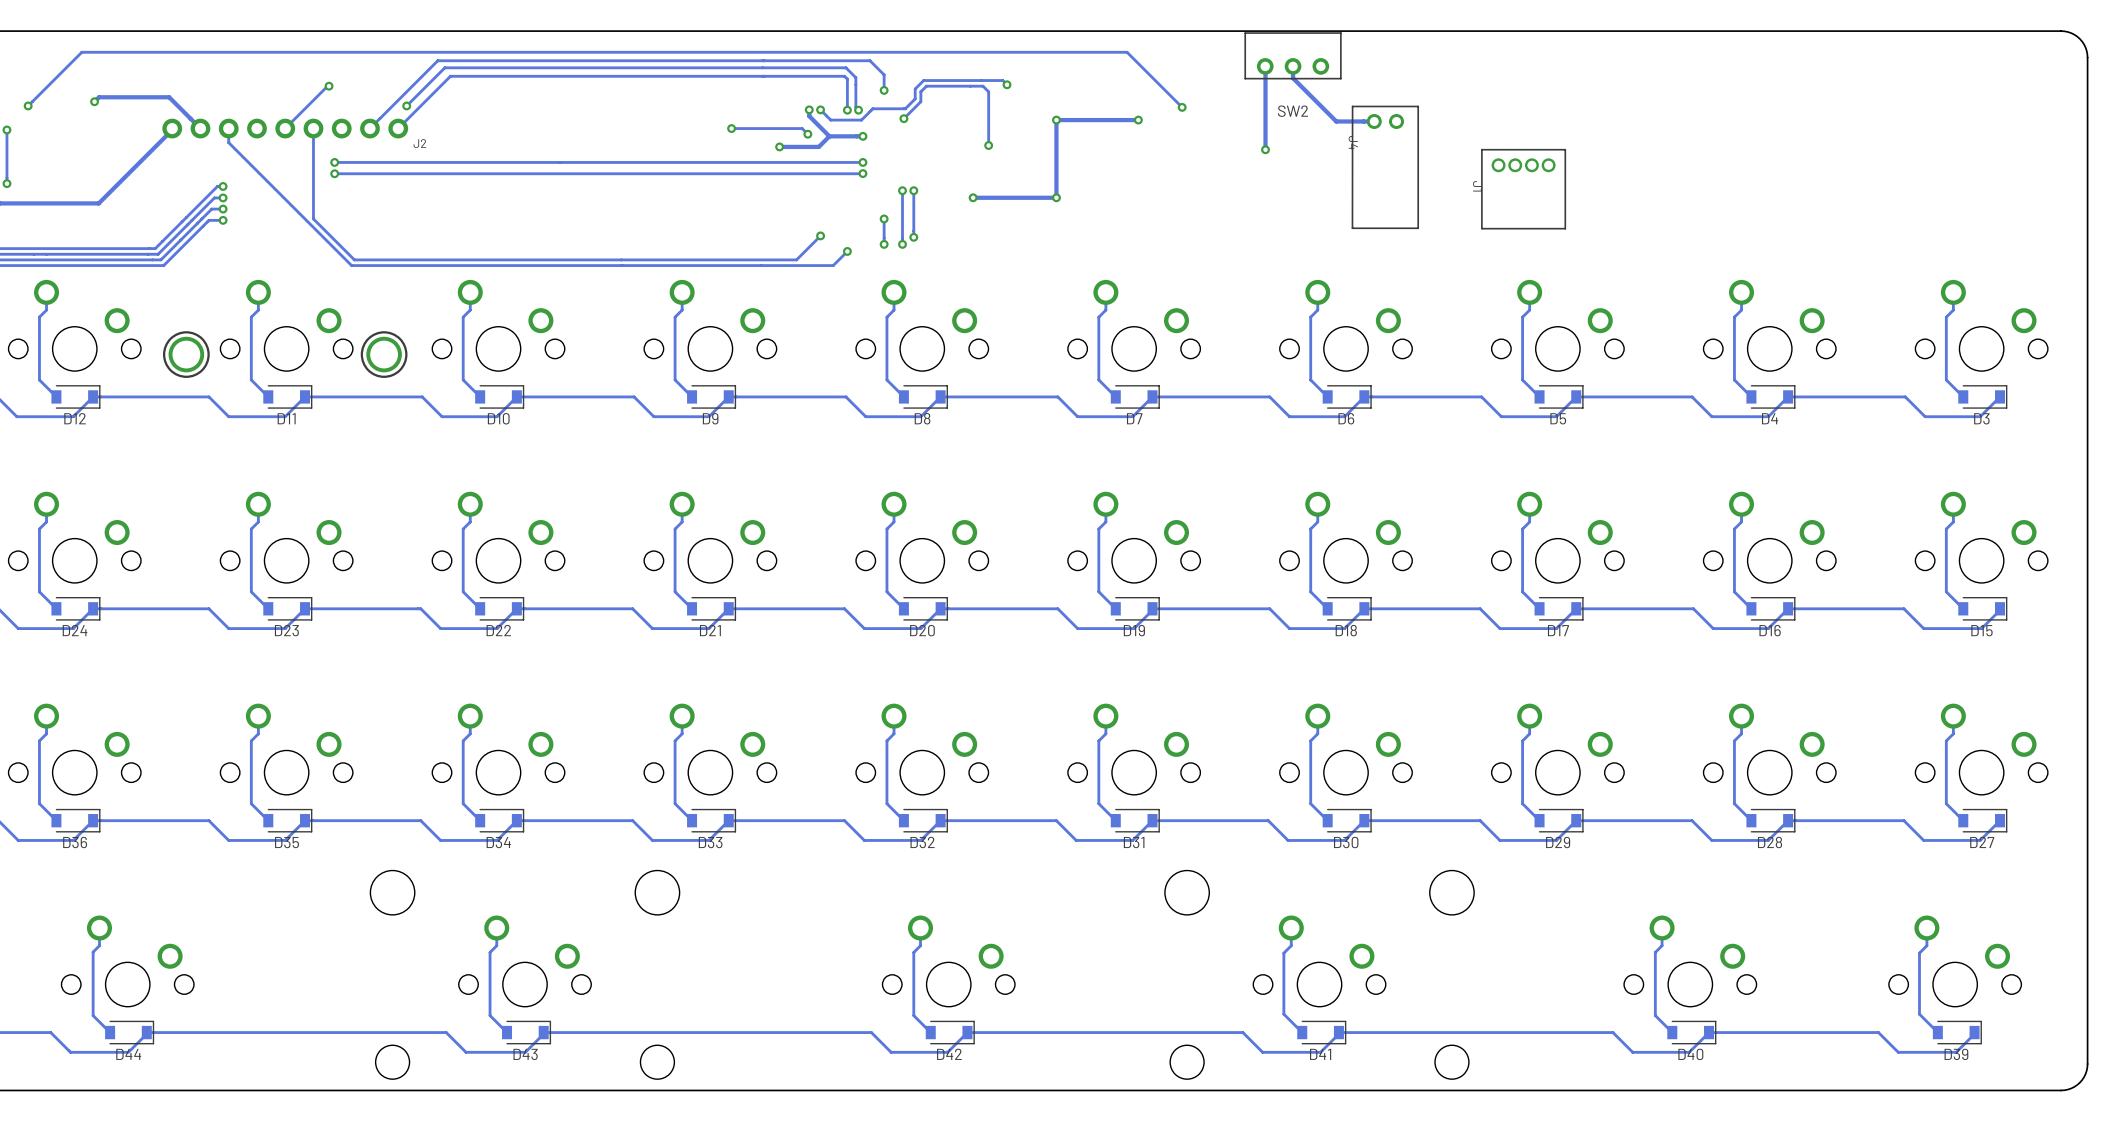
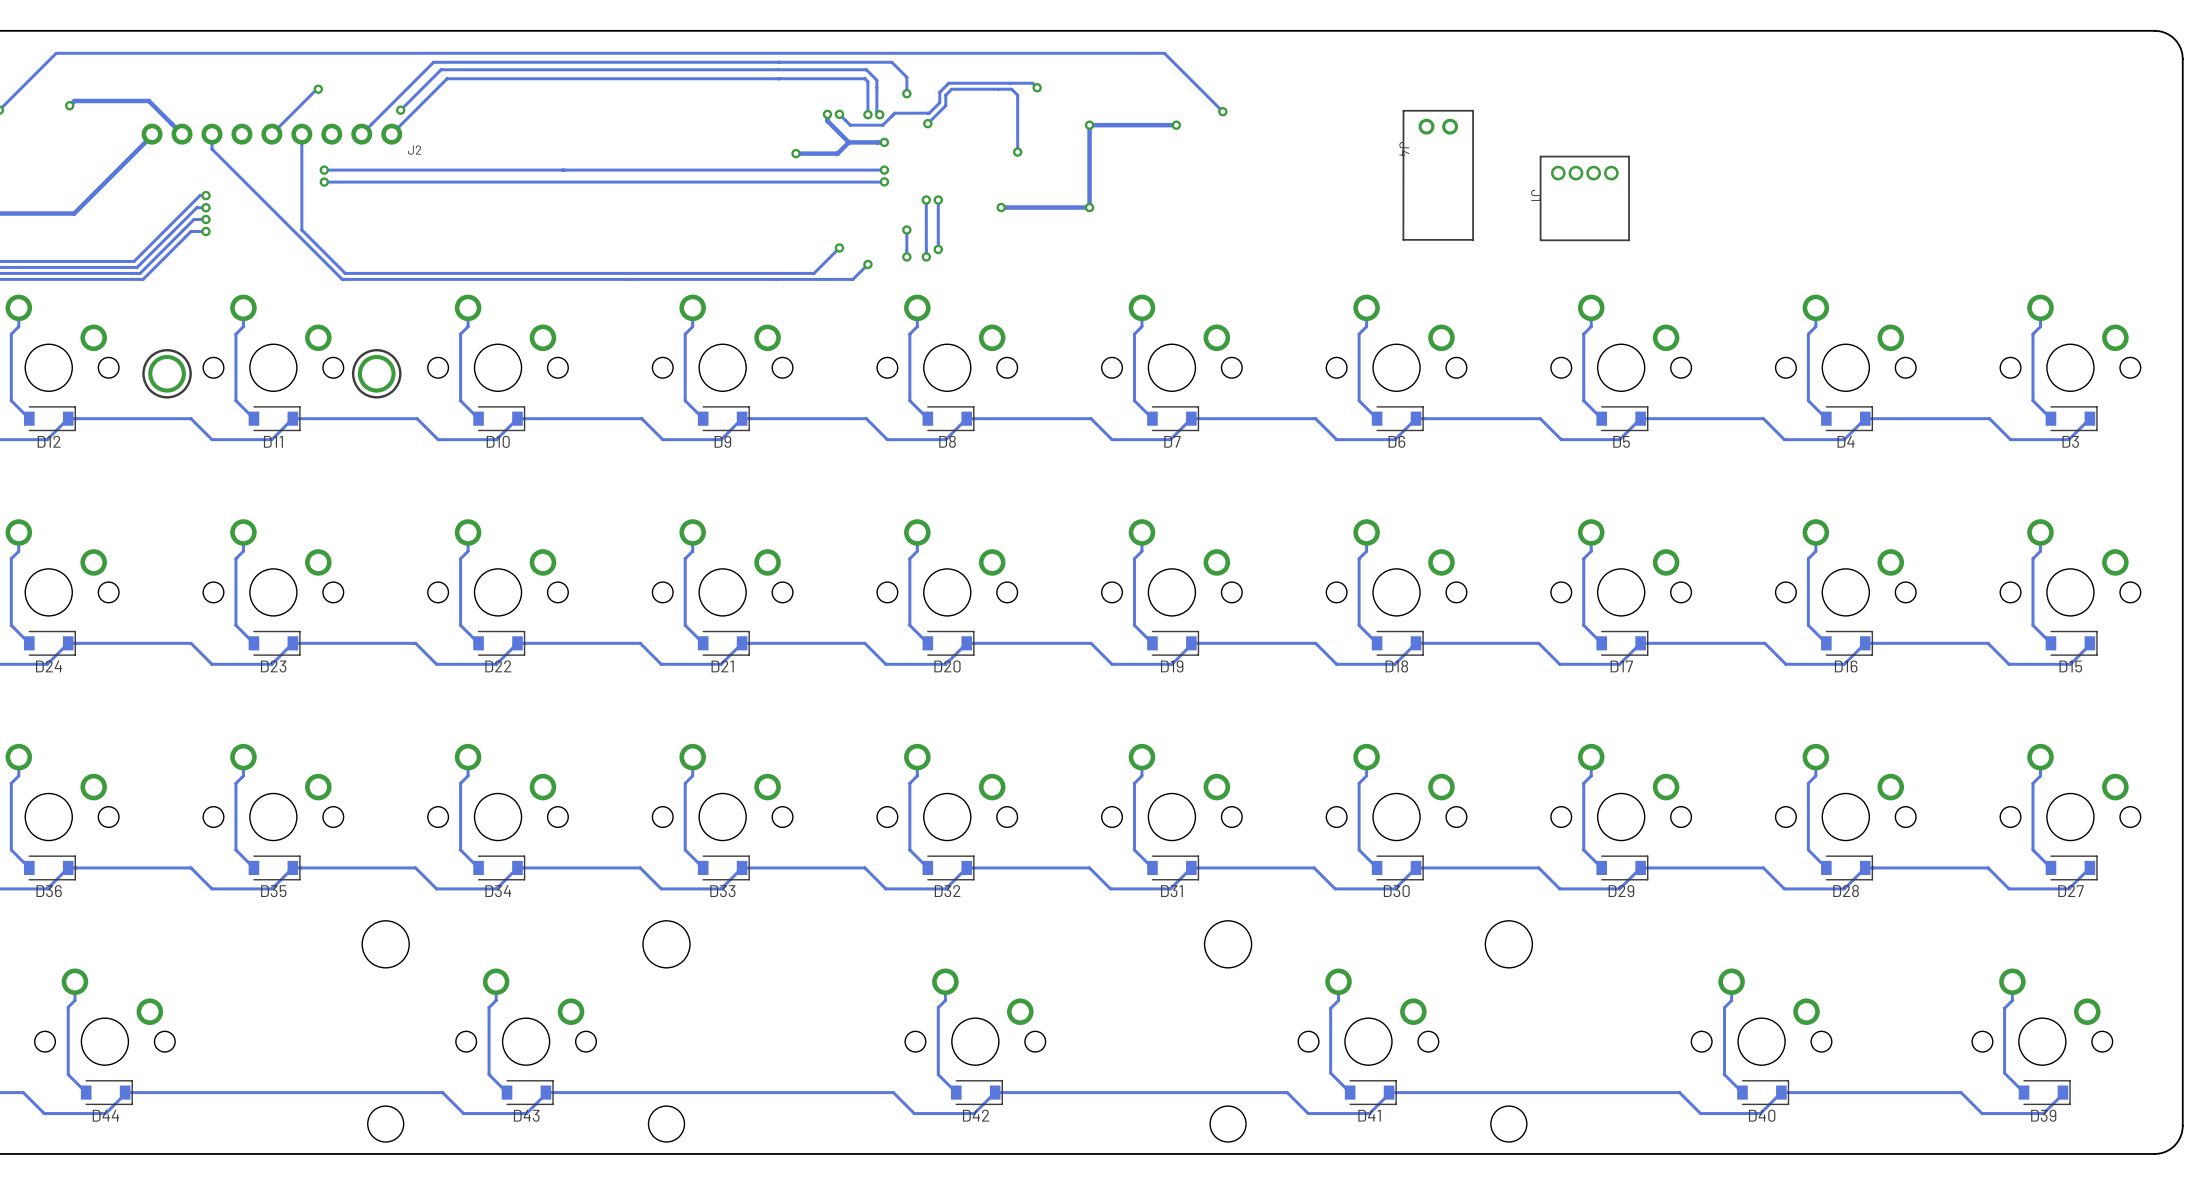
SW2: (1293, 55) -> none
track: (1265, 66) (1265, 149) -> none
track: (1293, 66) (1293, 78) (1336, 121) (1374, 121) -> none
track: (731, 128) (802, 128) (807, 134) -> none
via: (731, 128) -> none
via: (807, 134) -> none
via: (1265, 149) -> none

